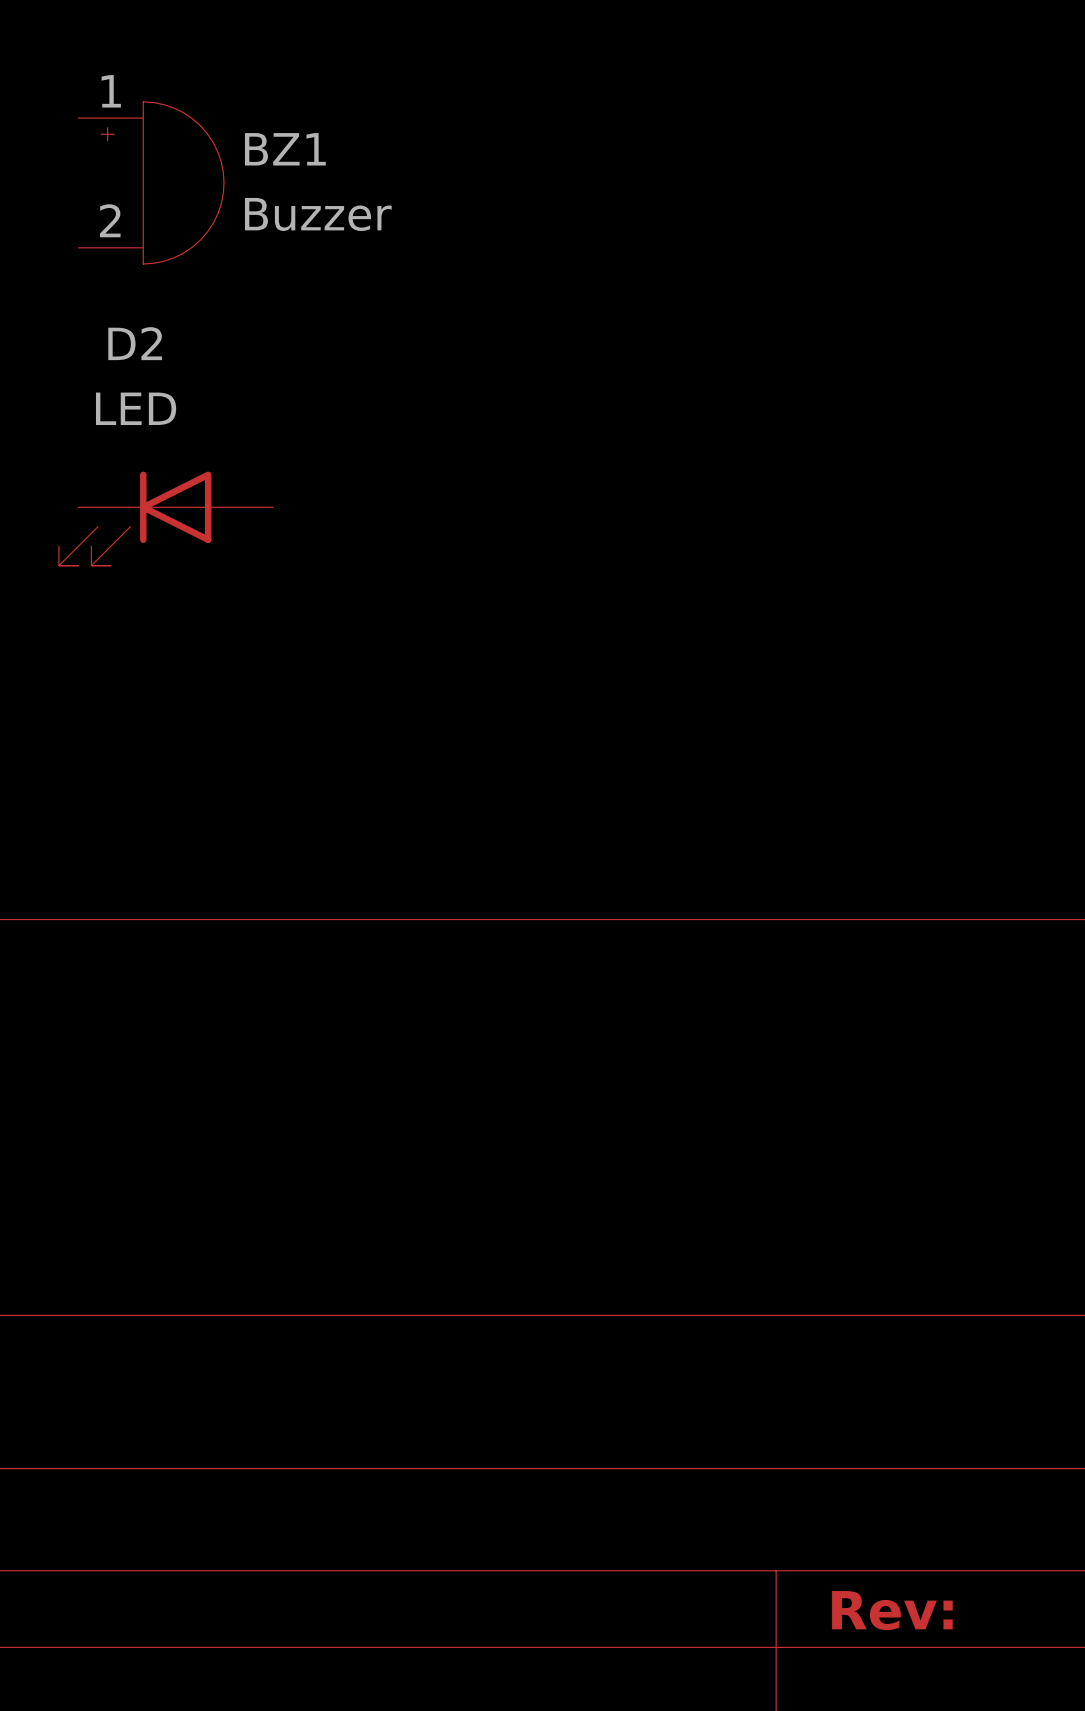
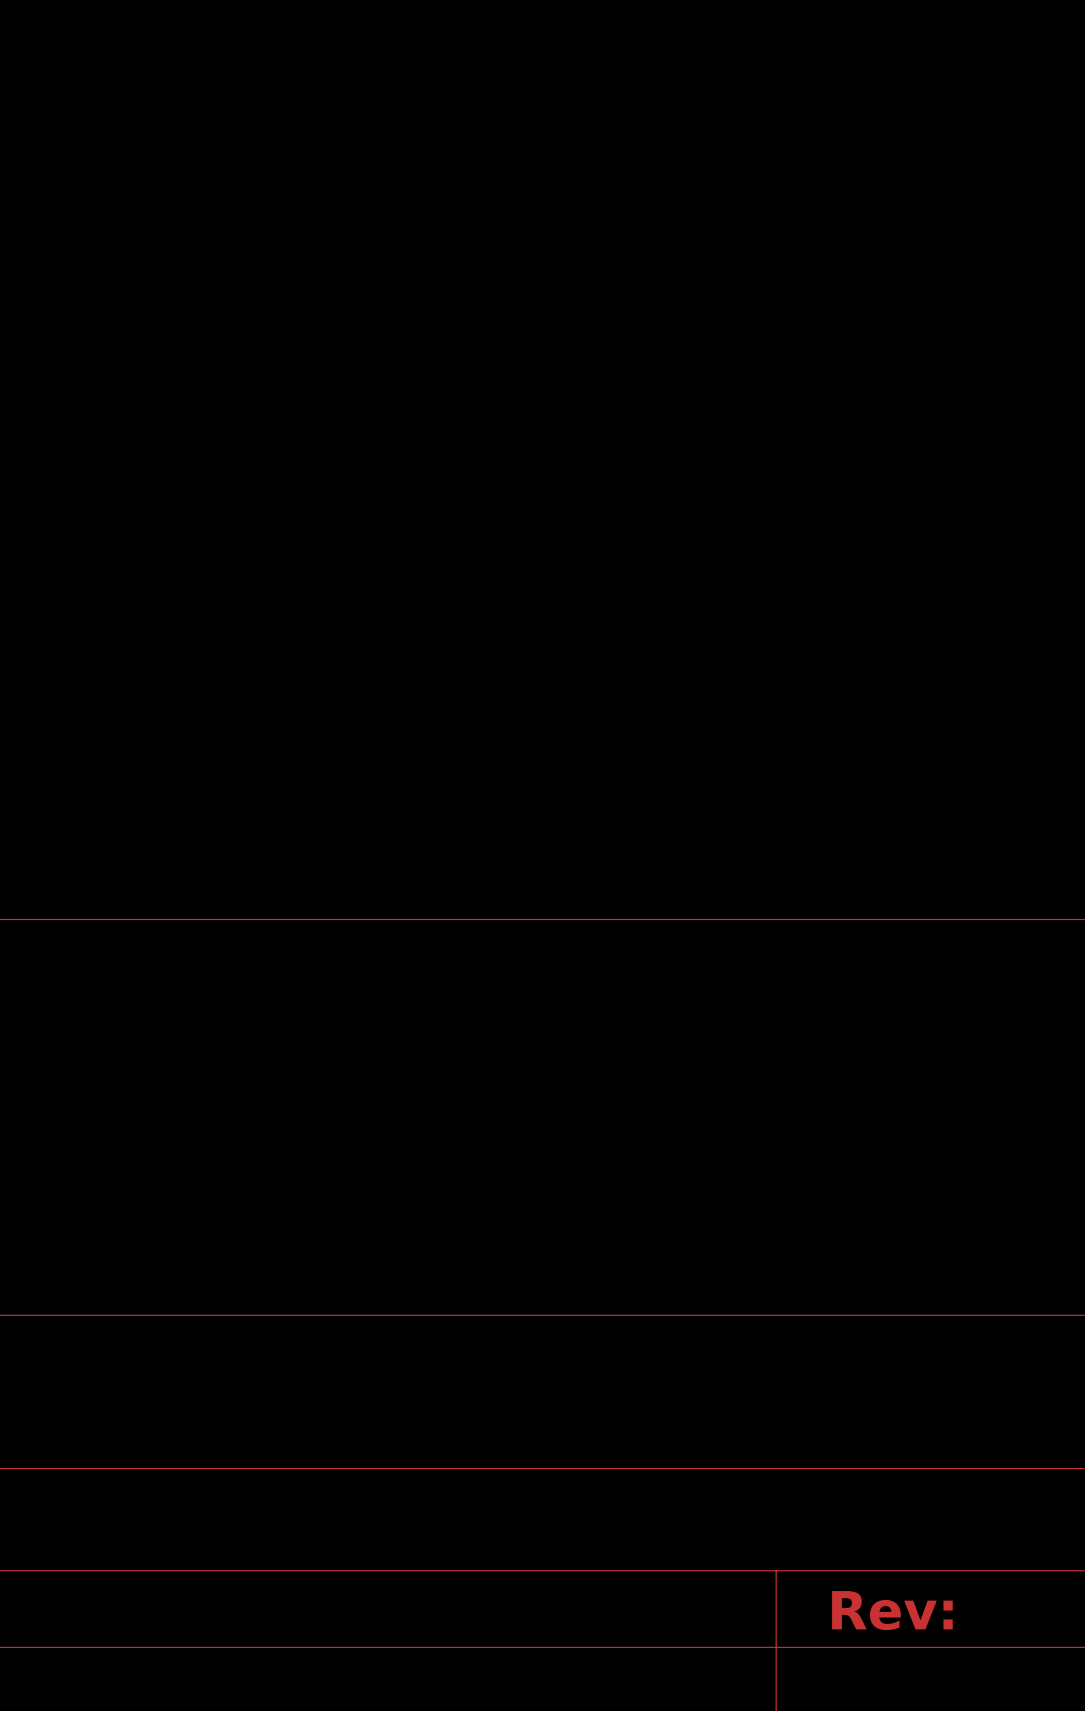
BZ1: Buzzer (151, 182) -> none
D2: LED (165, 518) -> none

